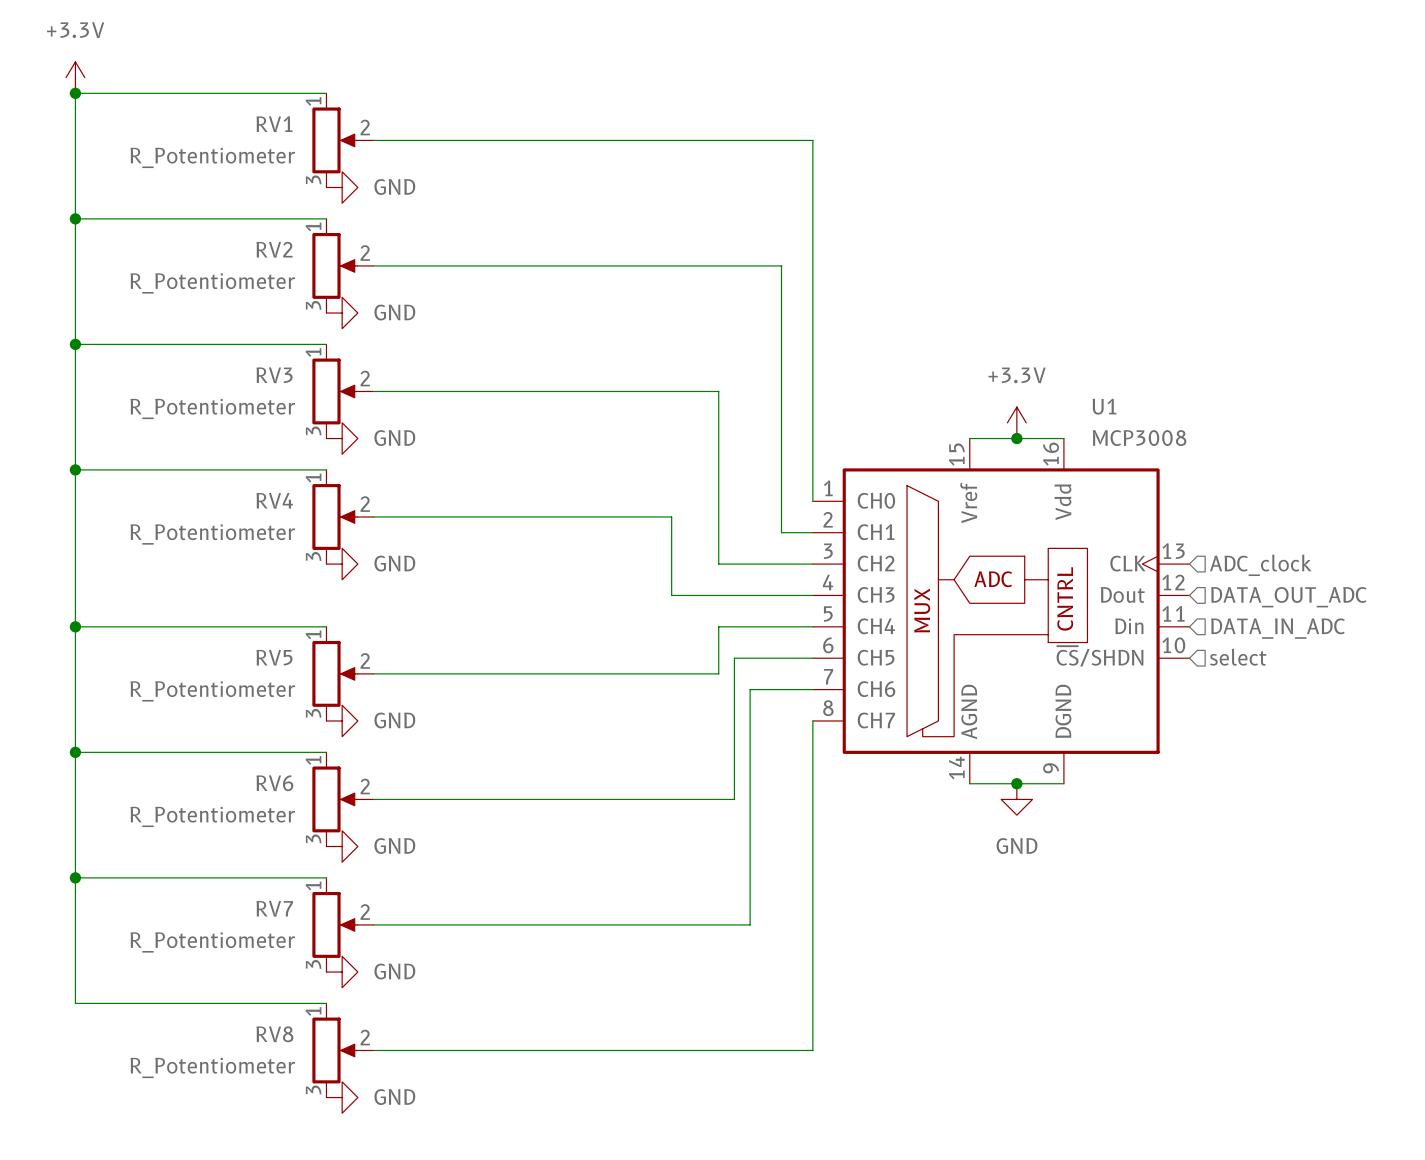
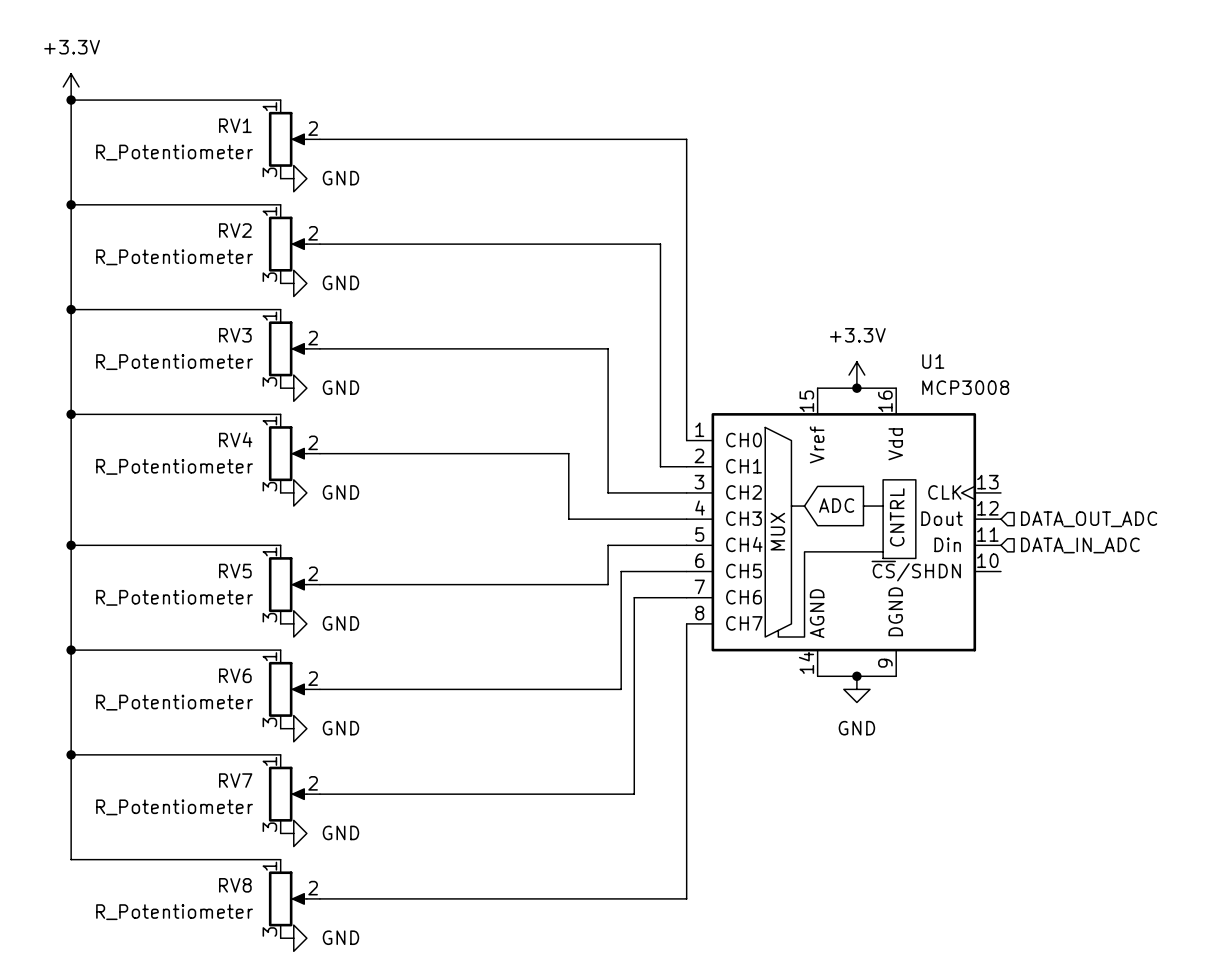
hierarchical label: ADC_clock (1260, 565) -> none
hierarchical label: select (1238, 657) -> none

